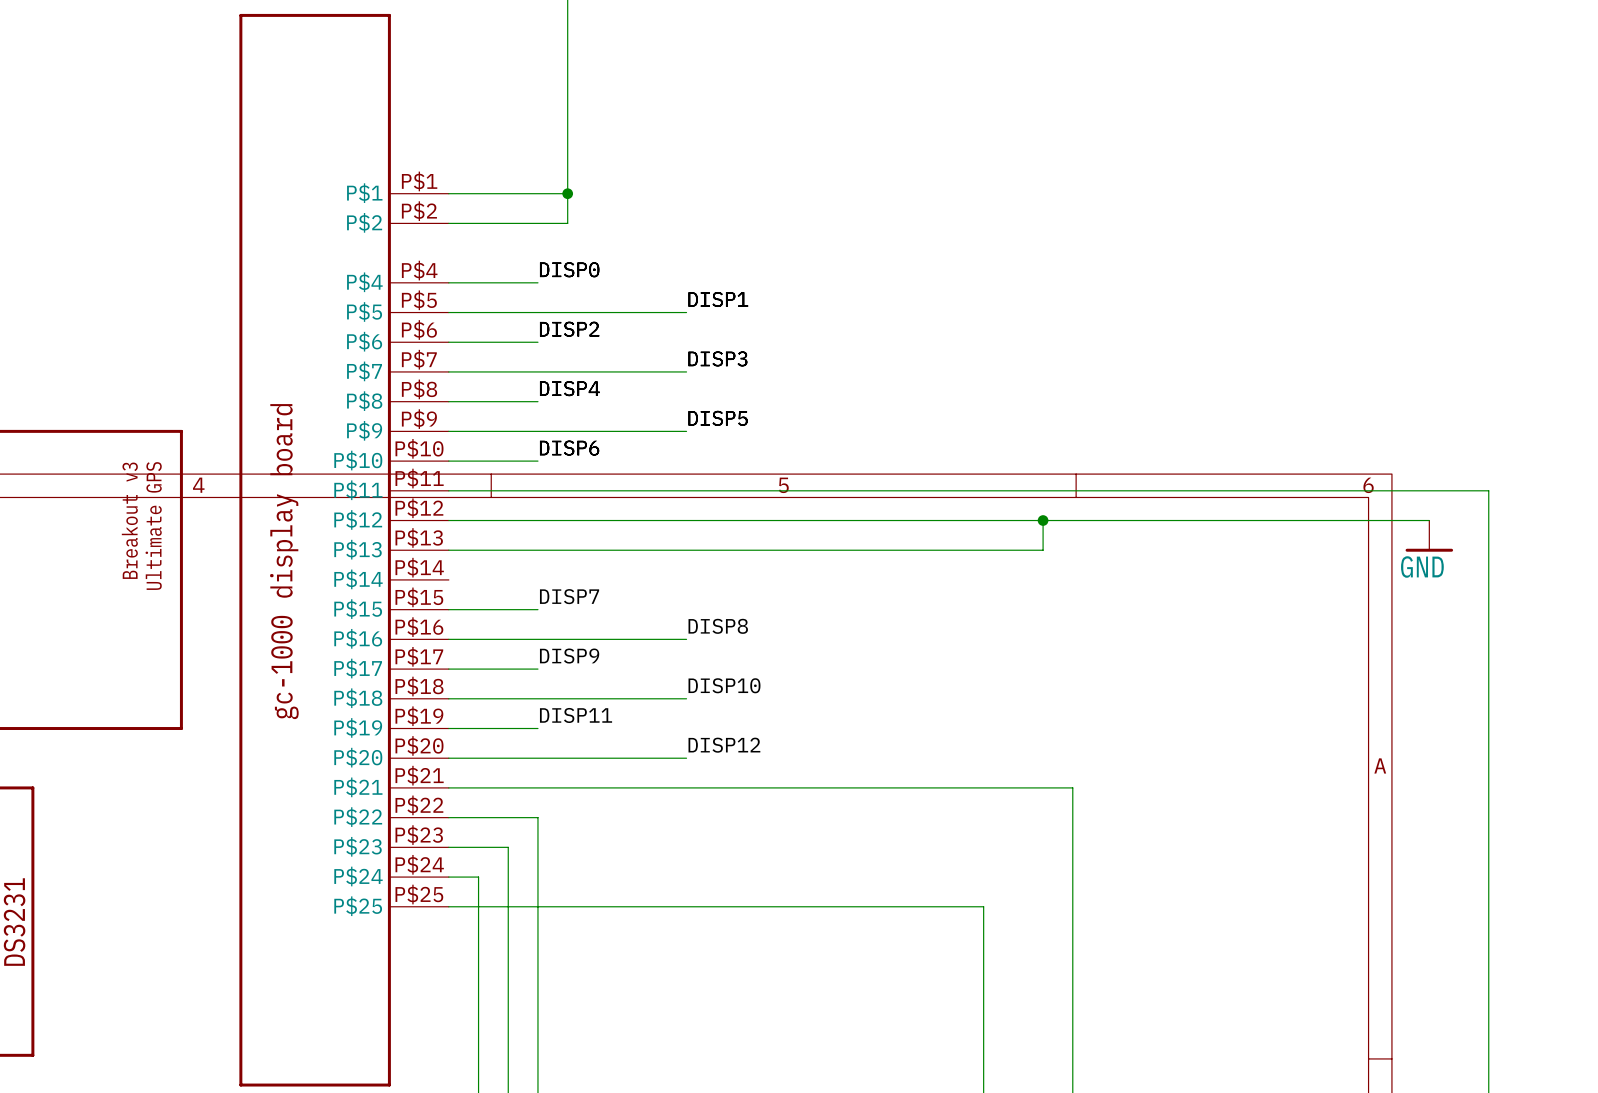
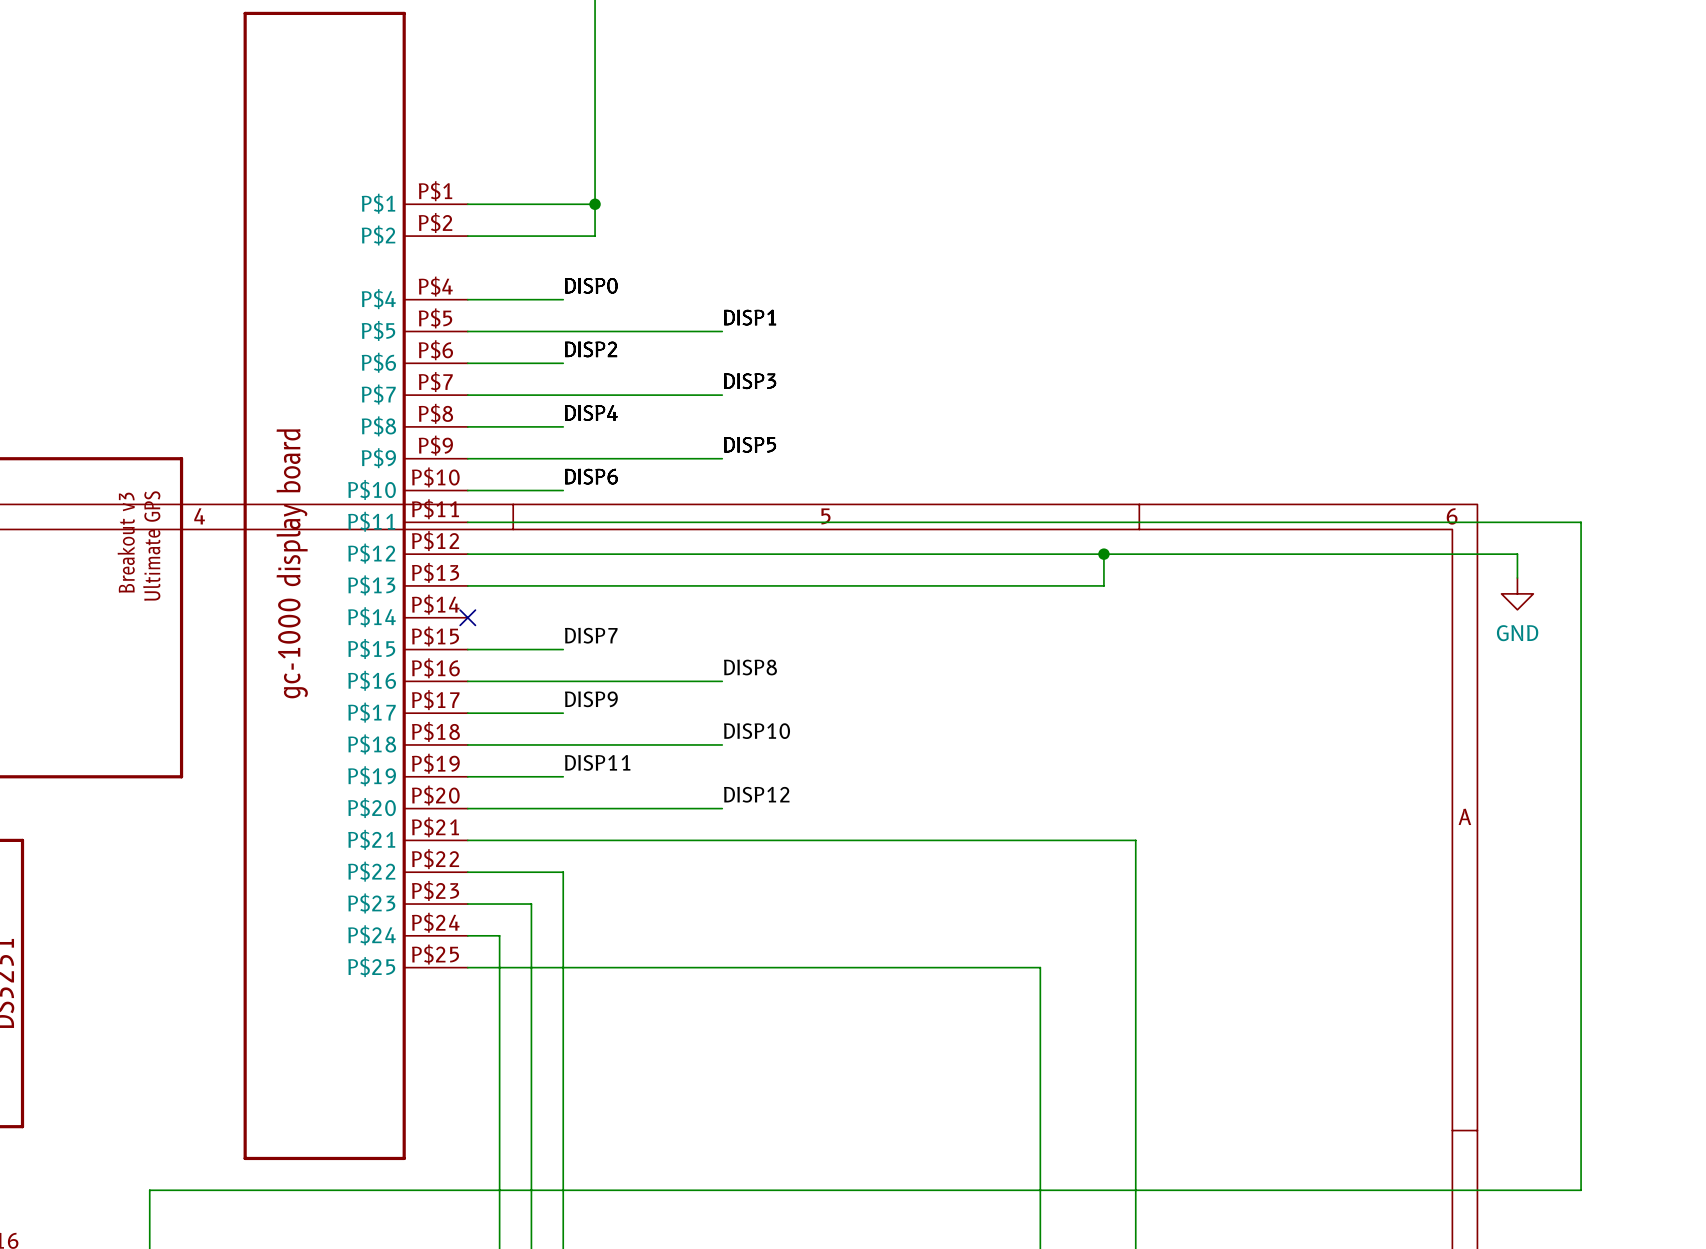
power symbol: GND (1429, 536) -> none
power symbol: none -> GND (1517, 593)
no-connect mark: none -> (467, 617)

